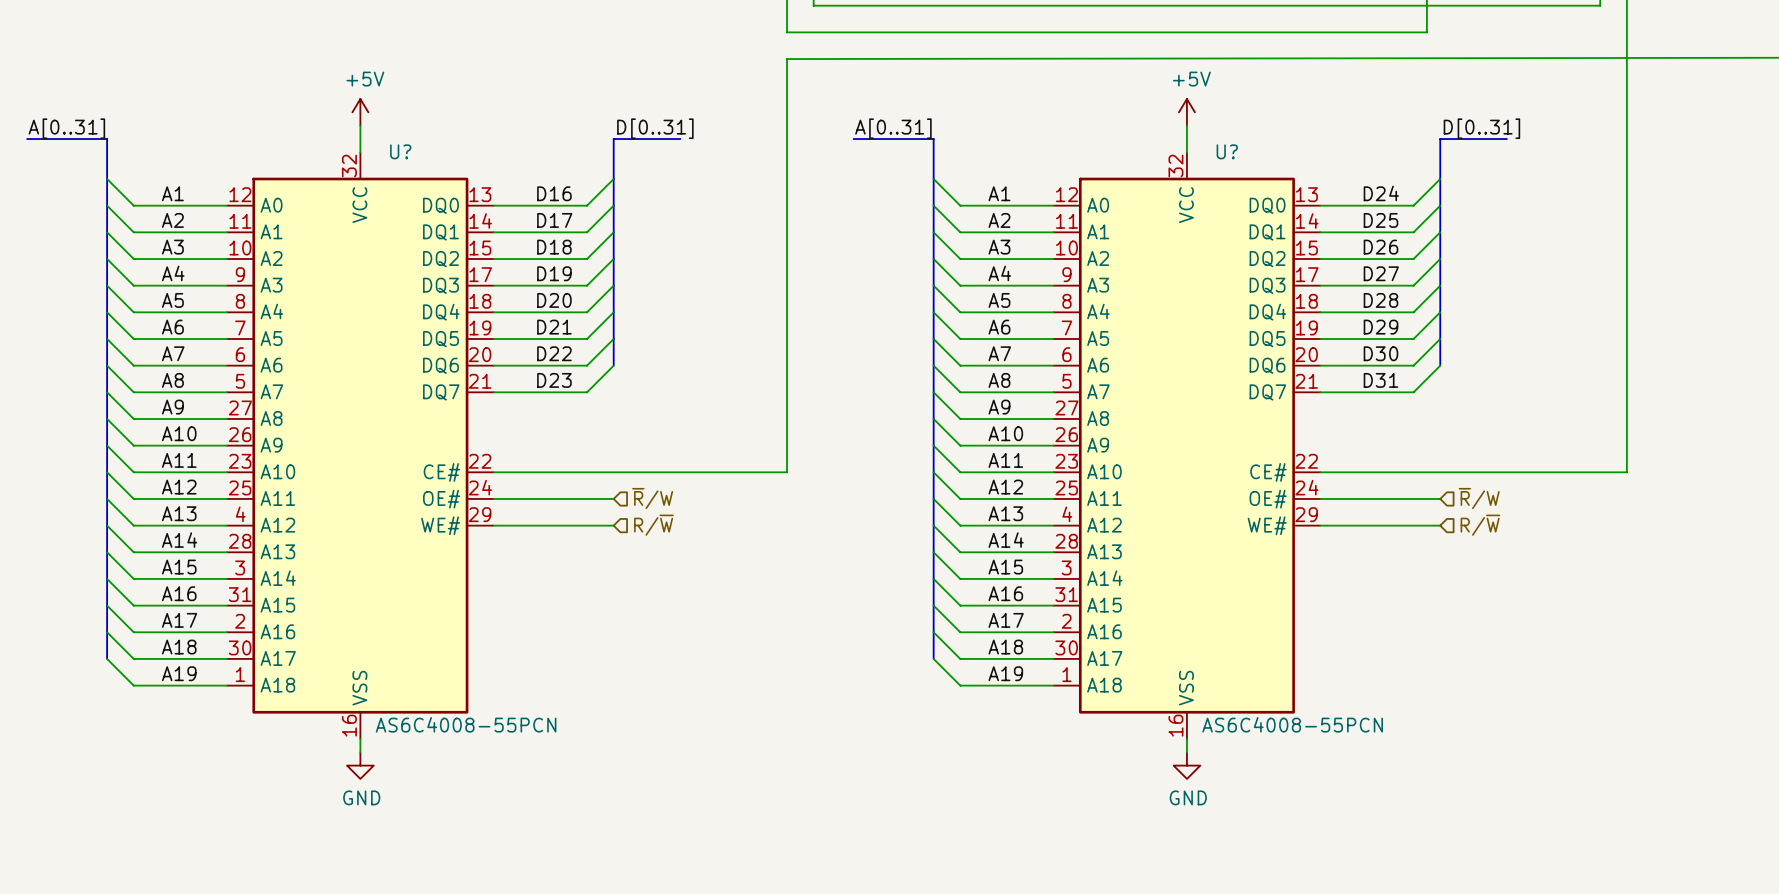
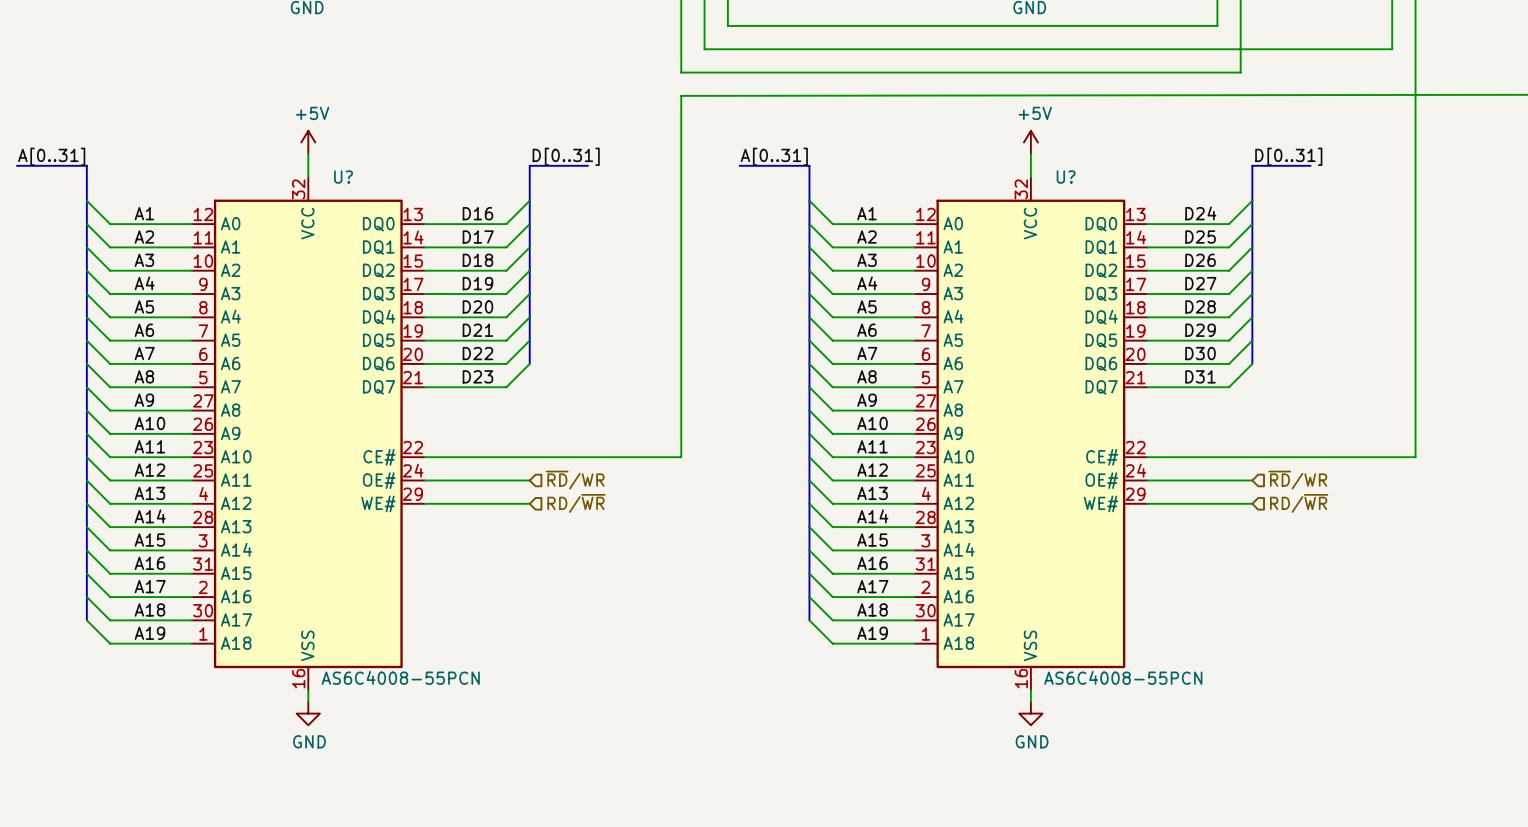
hierarchical label: ~{R}/W (652, 498) -> ~{RD}/WR (575, 480)
hierarchical label: ~{R}/W (1479, 498) -> ~{RD}/WR (1297, 480)
hierarchical label: R/~{W} (653, 525) -> RD/~{WR} (576, 503)
hierarchical label: R/~{W} (1480, 525) -> RD/~{WR} (1299, 503)

